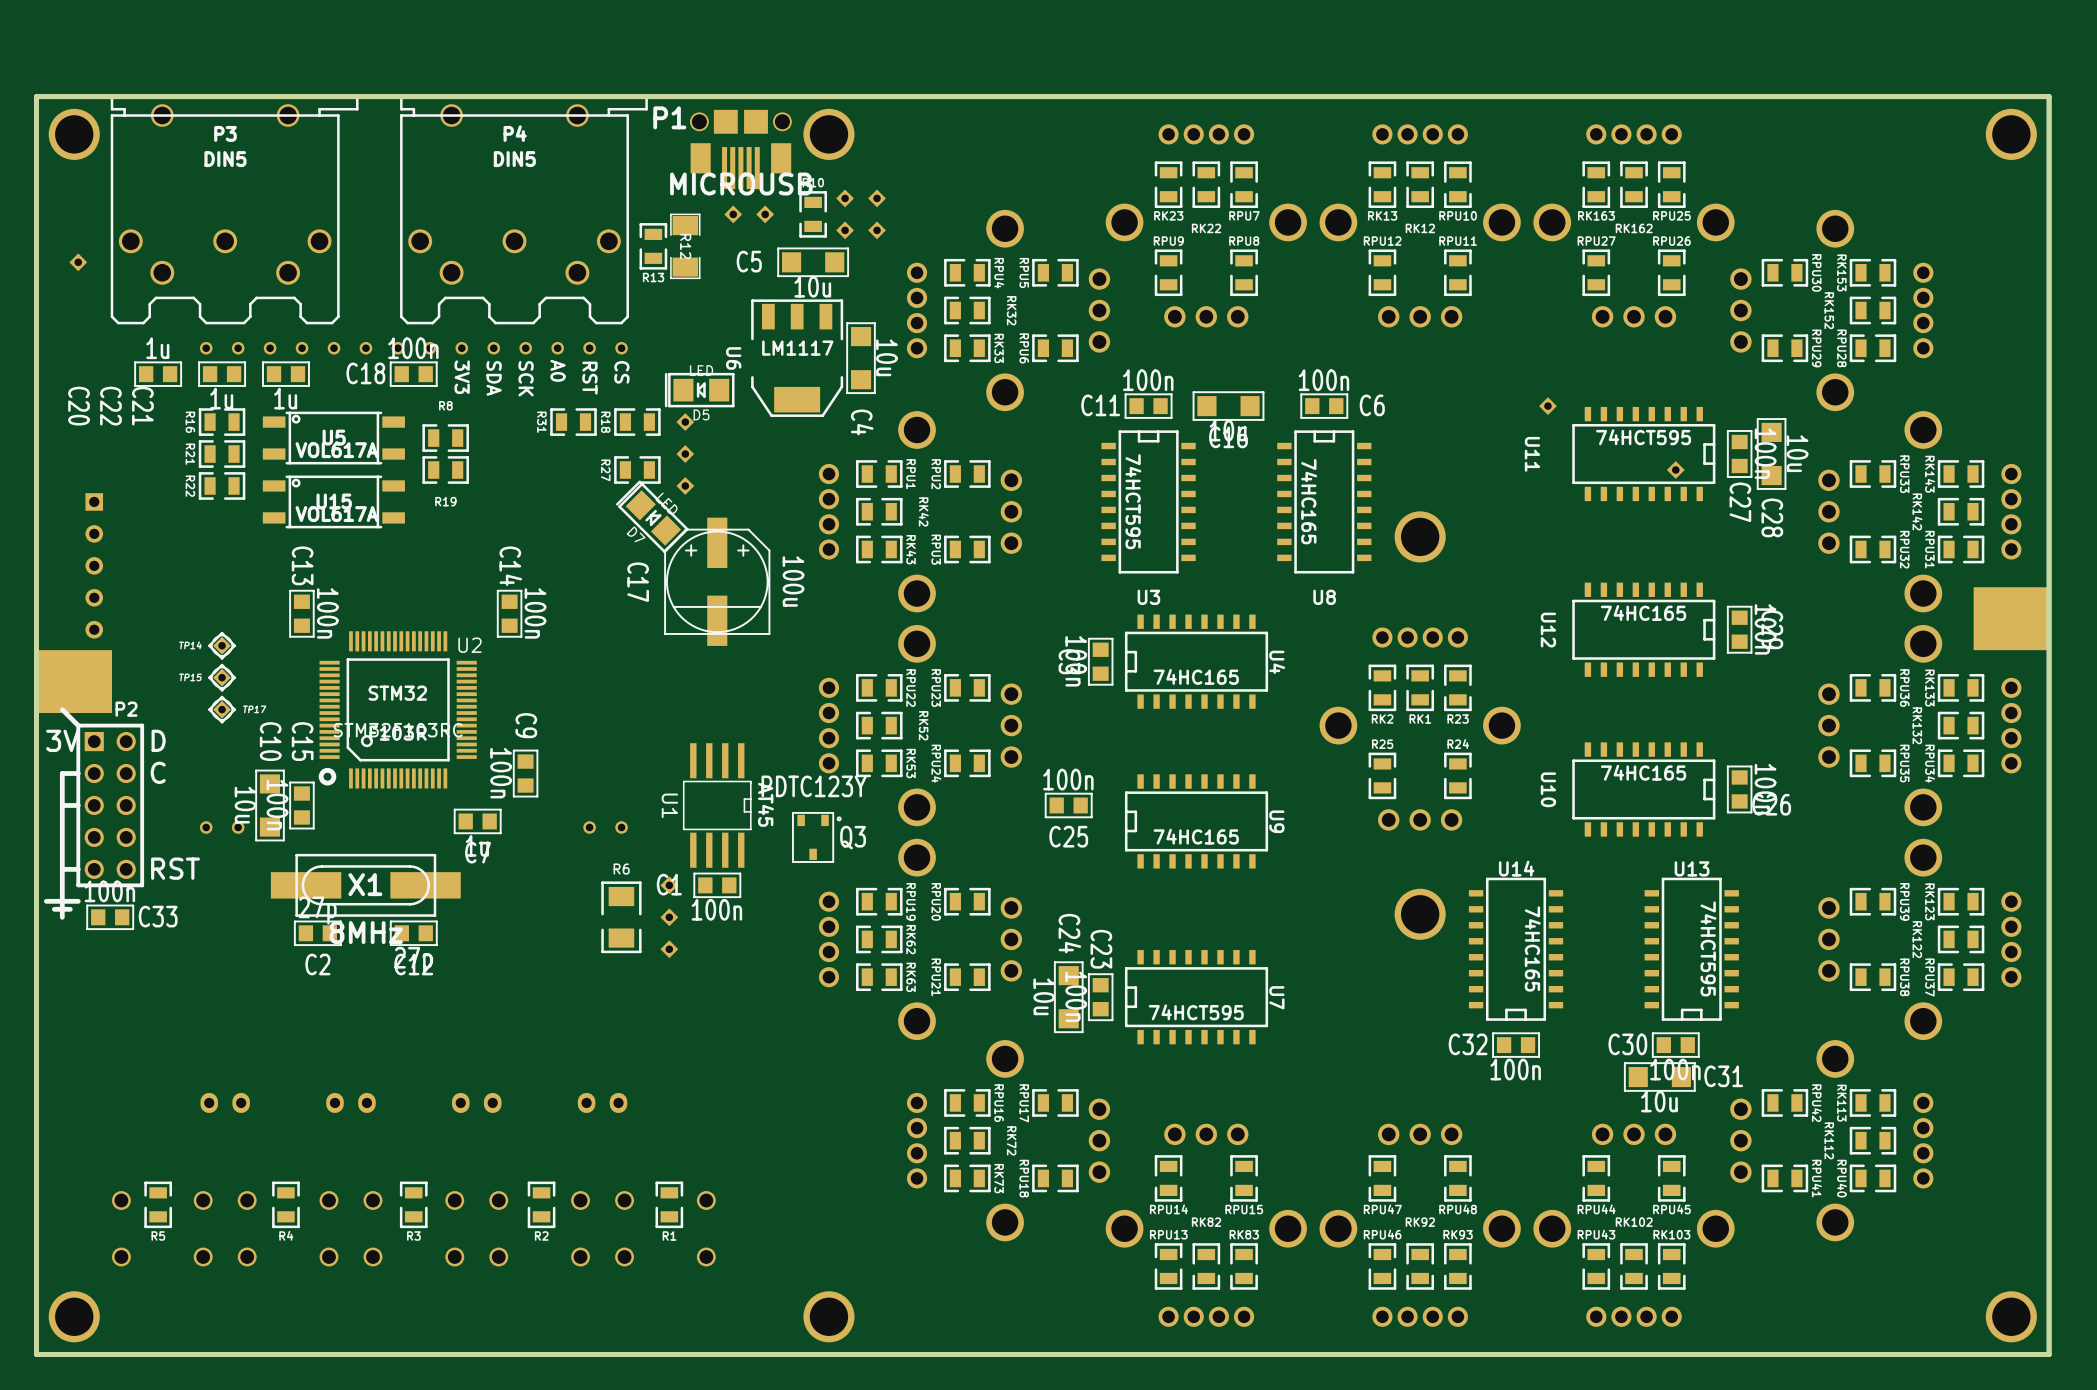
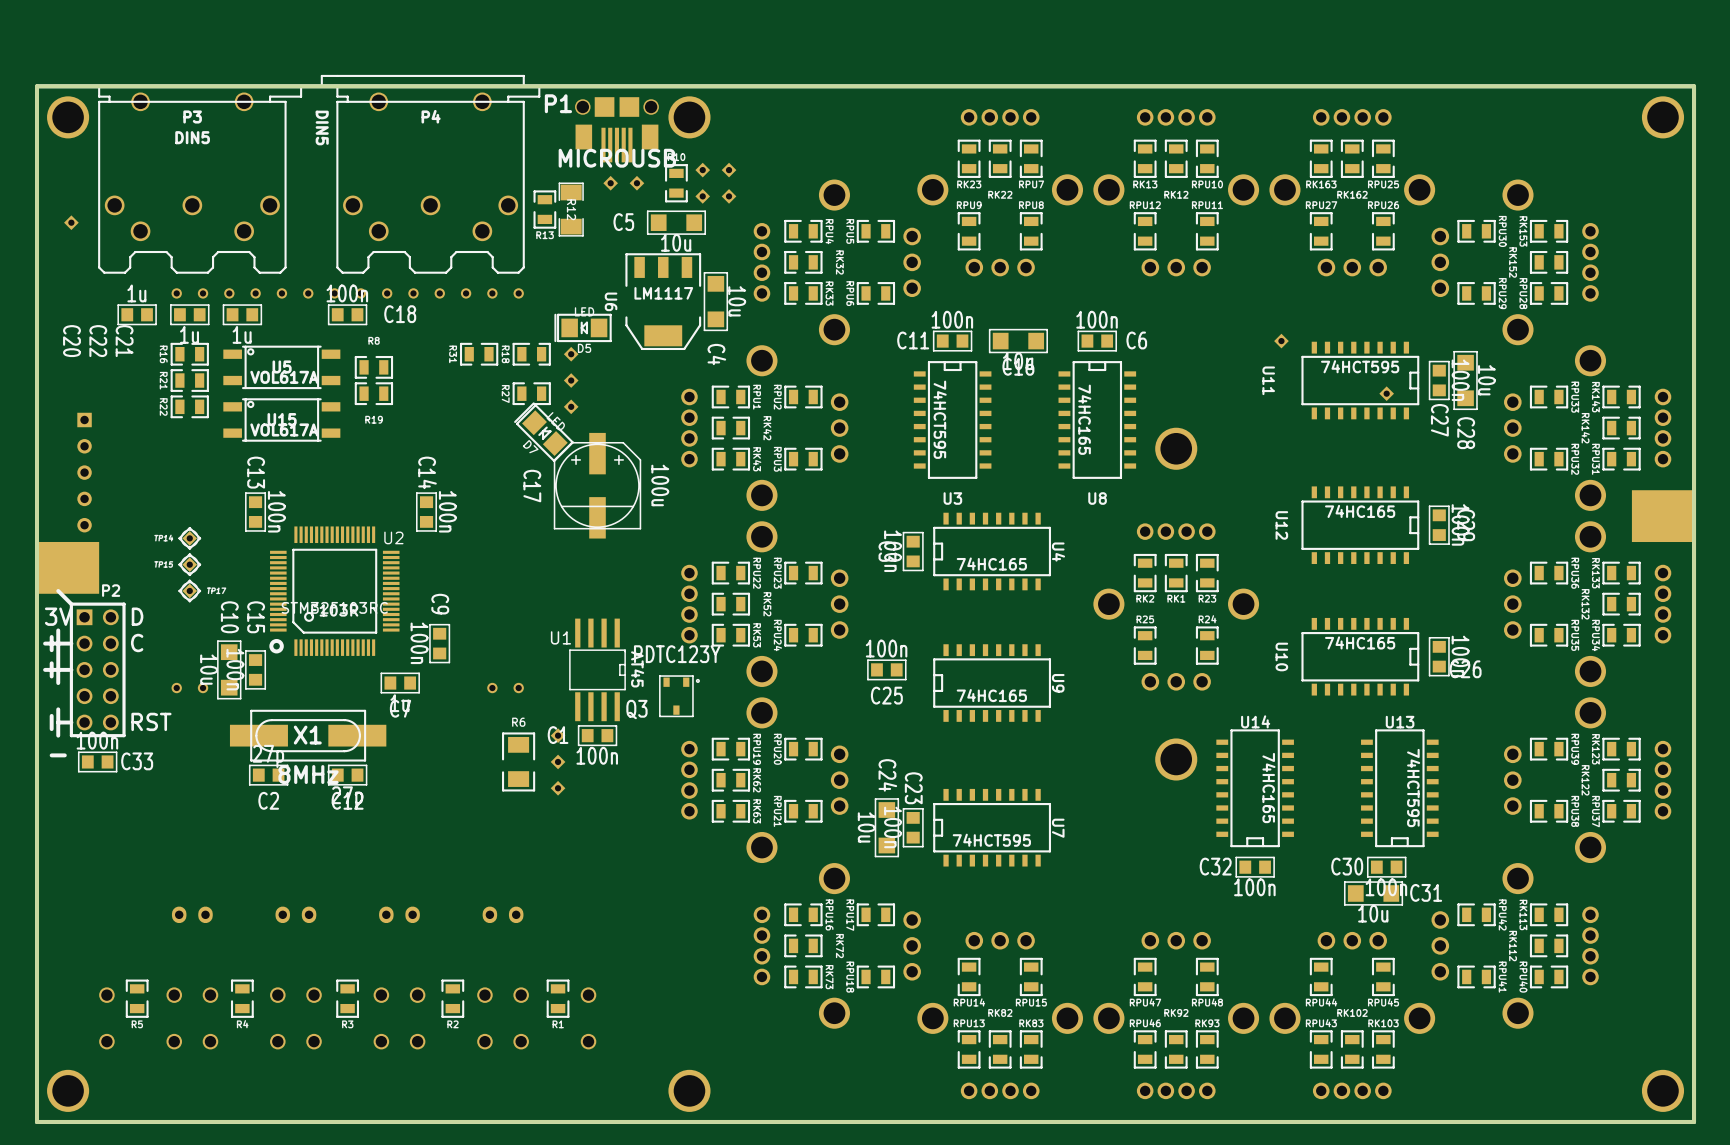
P4 footprint: [400, 95, 648, 325] -> [320, 74, 541, 274]
P4 value position: DIN5 (514, 159) -> DIN5 (322, 127)
text: A0 (558, 370) -> none
text: CS (621, 372) -> none
C18 name position: C18 (365, 373) -> C18 (400, 314)
text: 3V3 (462, 377) -> none
text: SDA (494, 378) -> none
text: SCK (526, 378) -> none
text: RST (589, 378) -> none
text: STM32 (397, 693) -> none
line: none -> (58, 630) (58, 643) (45, 643)
line: none -> (51, 637) (51, 650)
line: none -> (51, 663) (51, 676)
line: none -> (58, 669) (45, 669)
U1 name rotation: 0° (669, 805) -> 90° counterclockwise (560, 637)
U1 name position: U1 (669, 805) -> U1 (560, 637)
line: (62, 821) (62, 853) -> none
Q3 name position: Q3 (853, 837) -> Q3 (636, 709)
line: none -> (51, 715) (51, 729)
line: (62, 885) (62, 917) -> none
line: (78, 901) (46, 901) -> none

